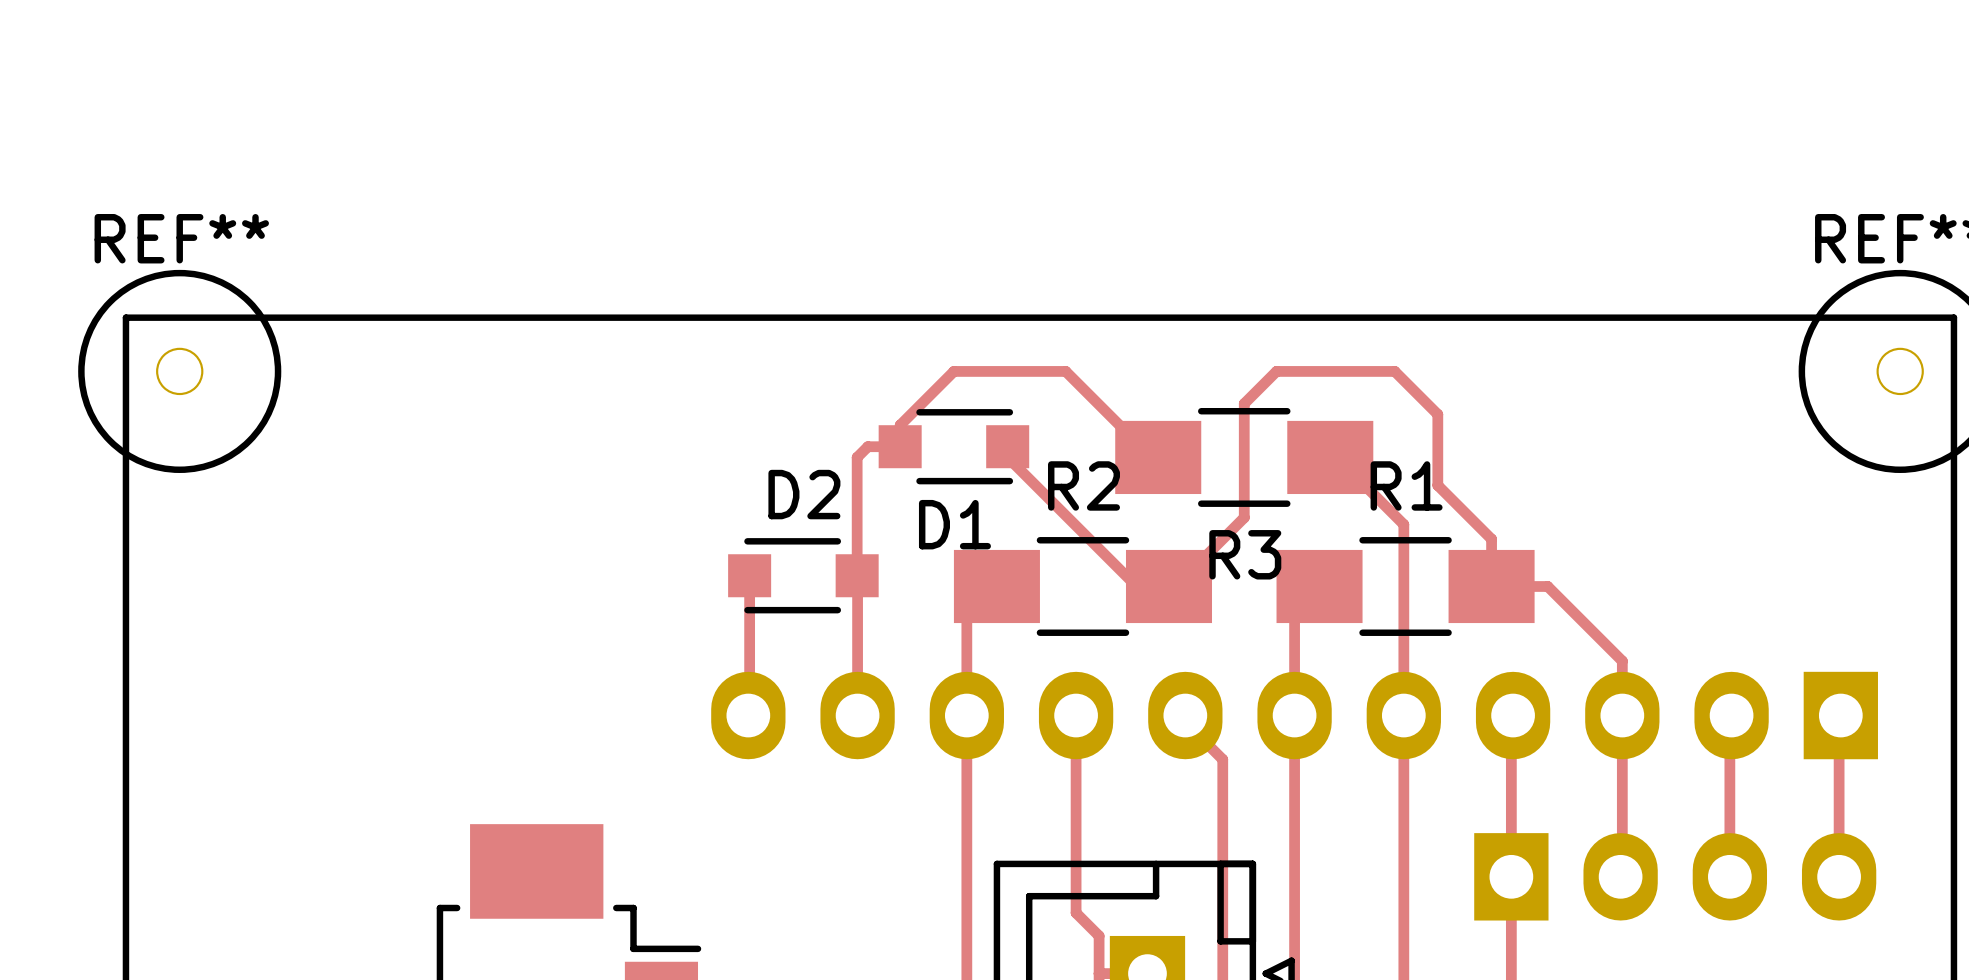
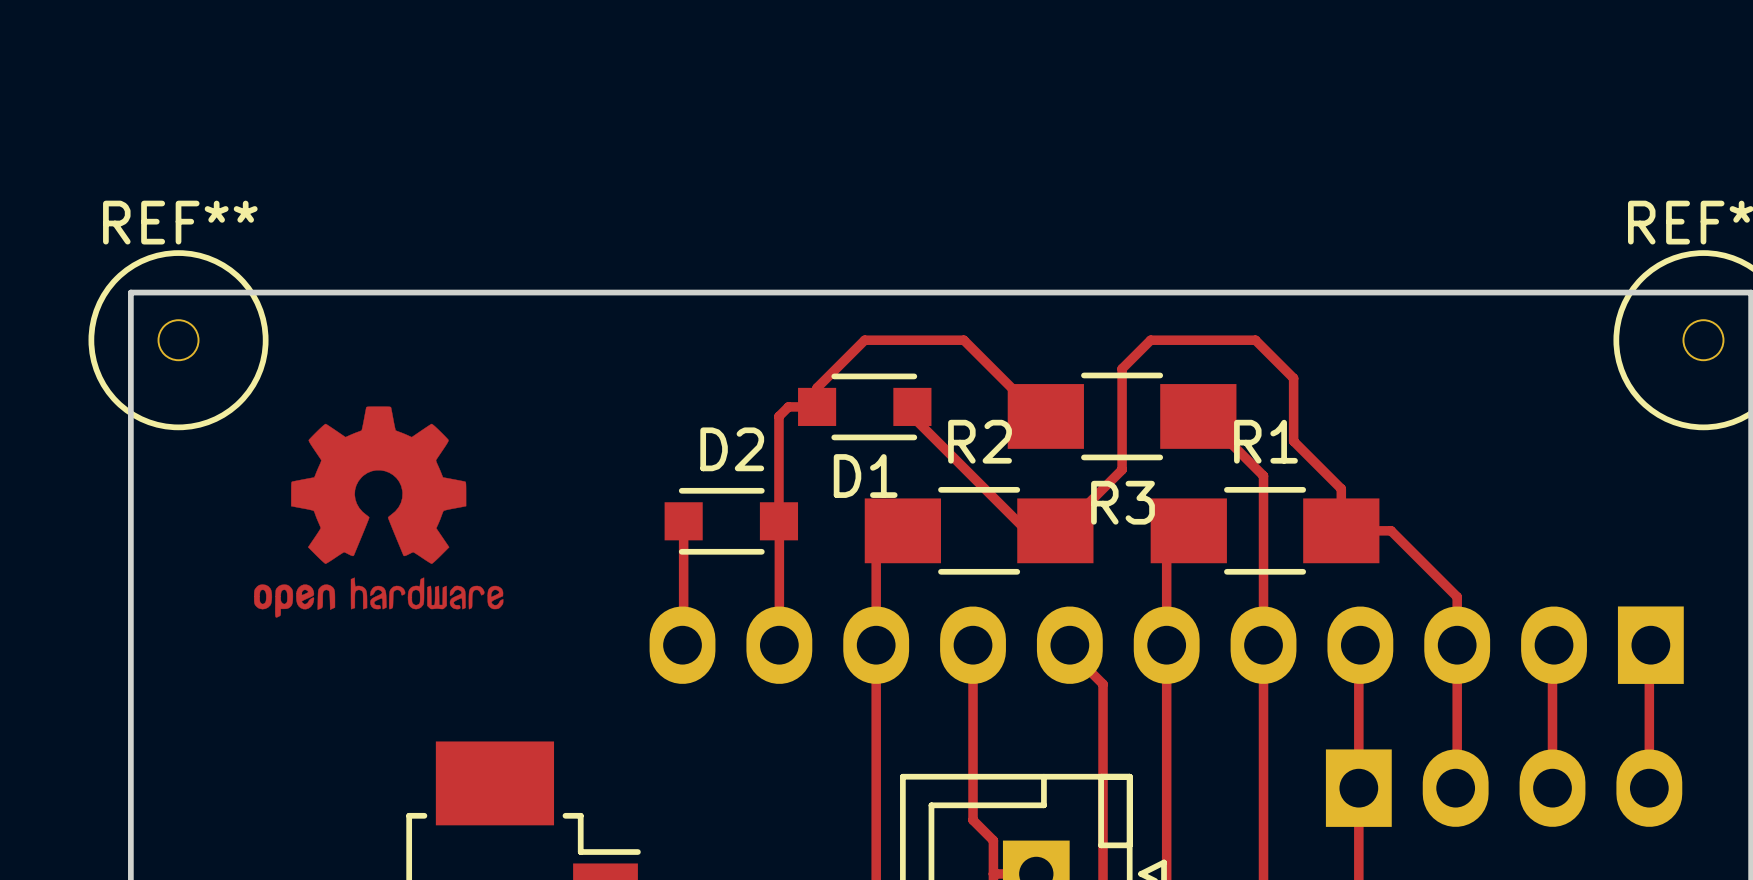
drawing: none -> [253, 406, 504, 618]

